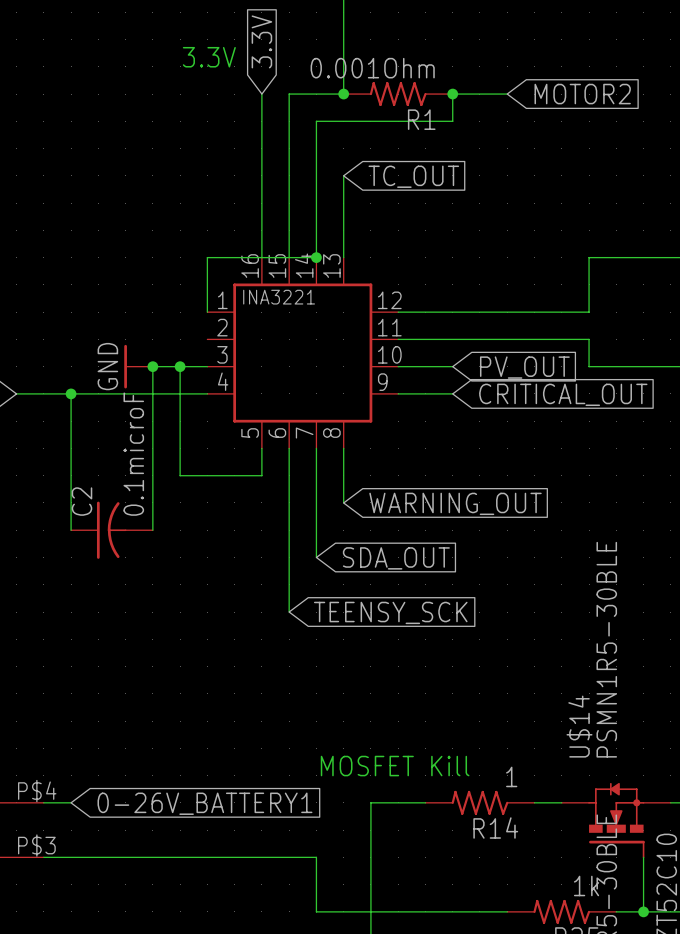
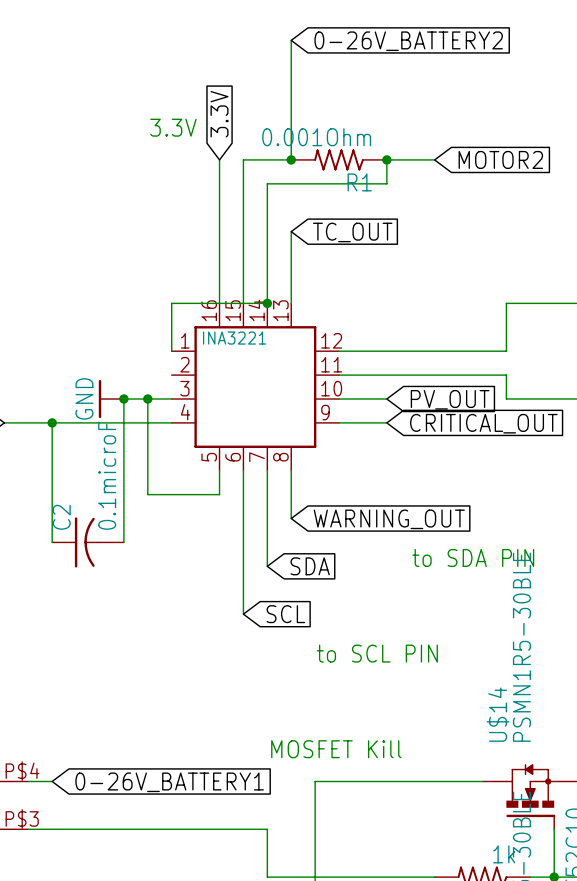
text: none -> to SDA PIN (473, 557)
global label: SDA_OUT (396, 558) -> SDA (310, 566)
global label: TEENSY_SCK (390, 612) -> SCL (285, 614)
text: none -> to SCL PIN (377, 653)
R14: 1 (479, 802) -> none

